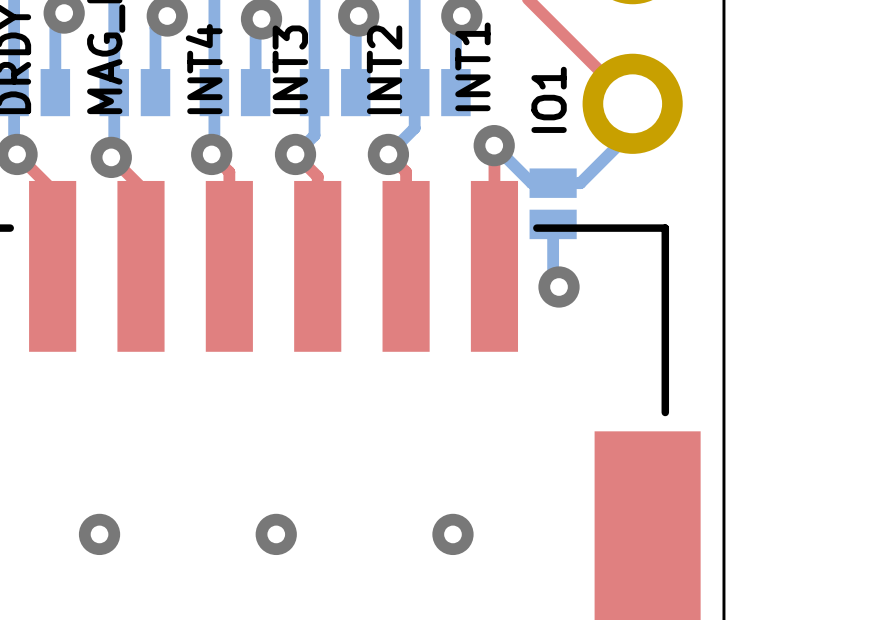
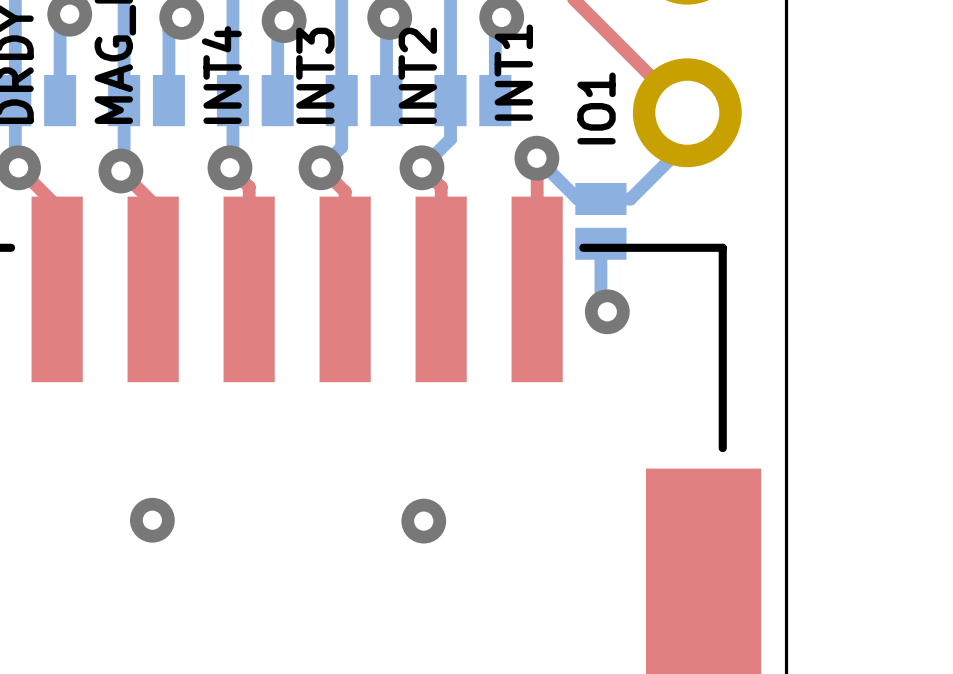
via: none -> (152, 520)
via: none -> (423, 521)
via: (99, 534) -> none
via: (276, 534) -> none
via: (452, 534) -> none

